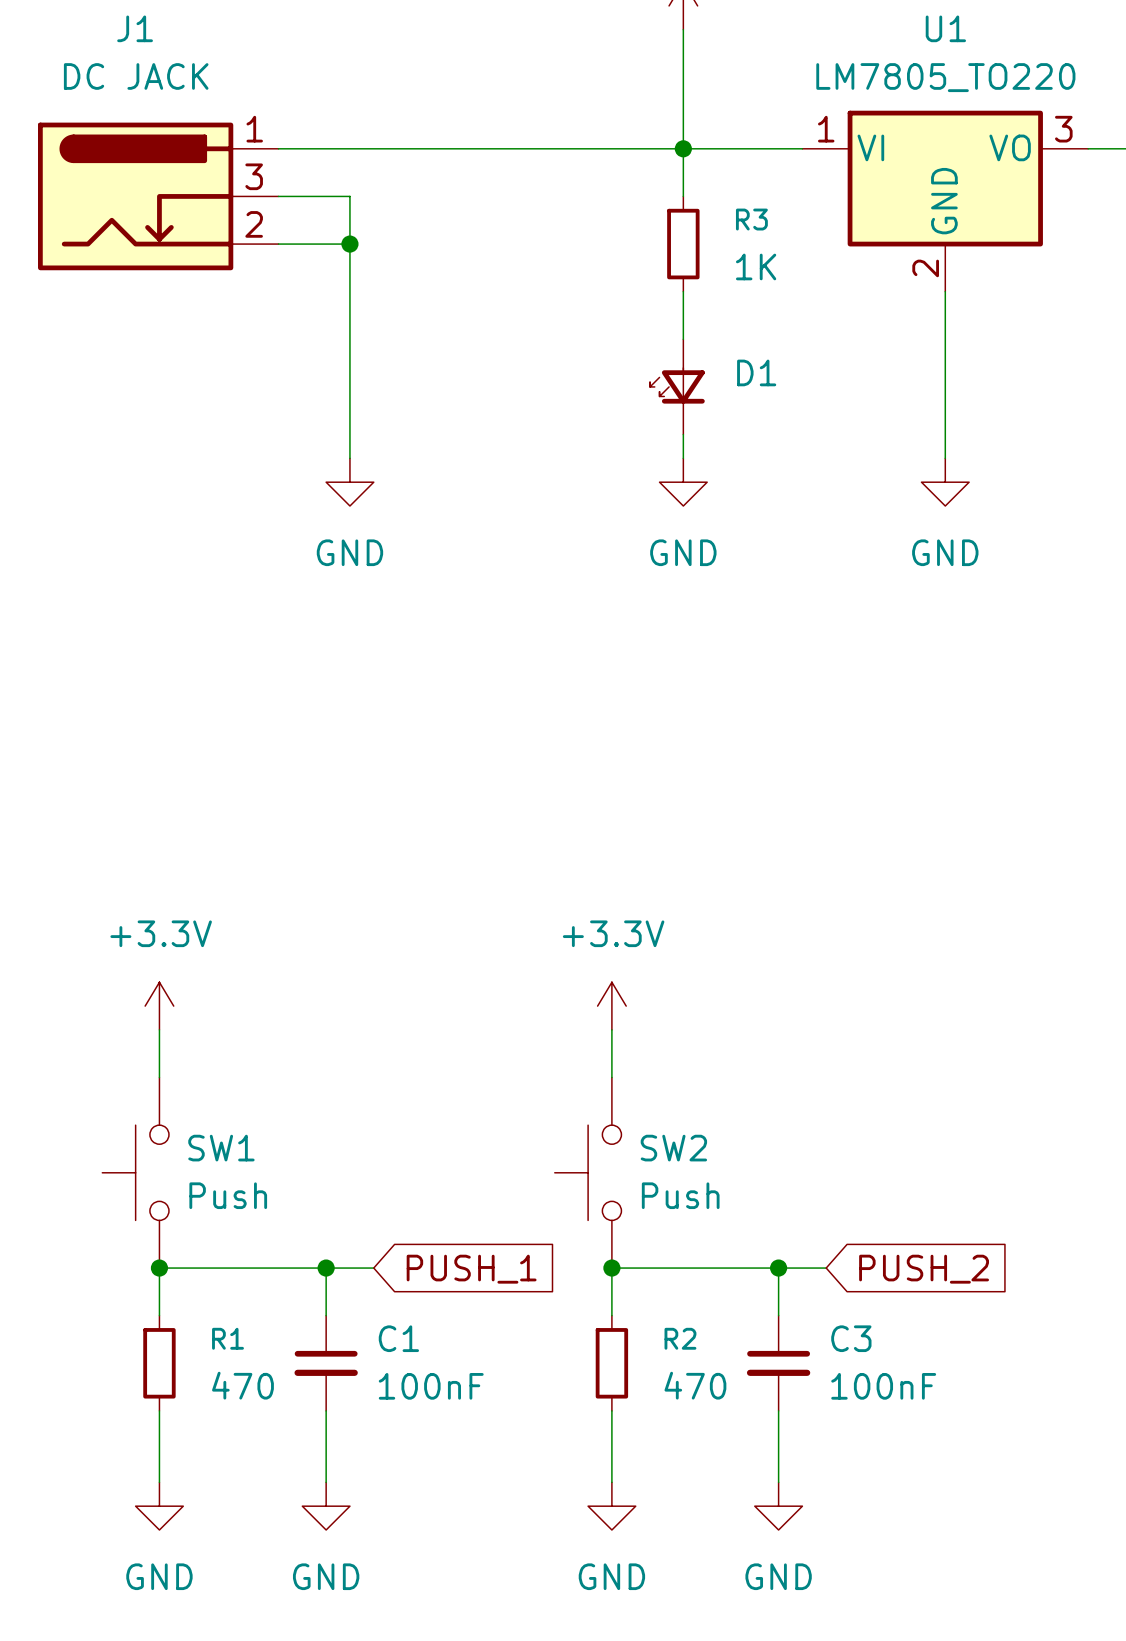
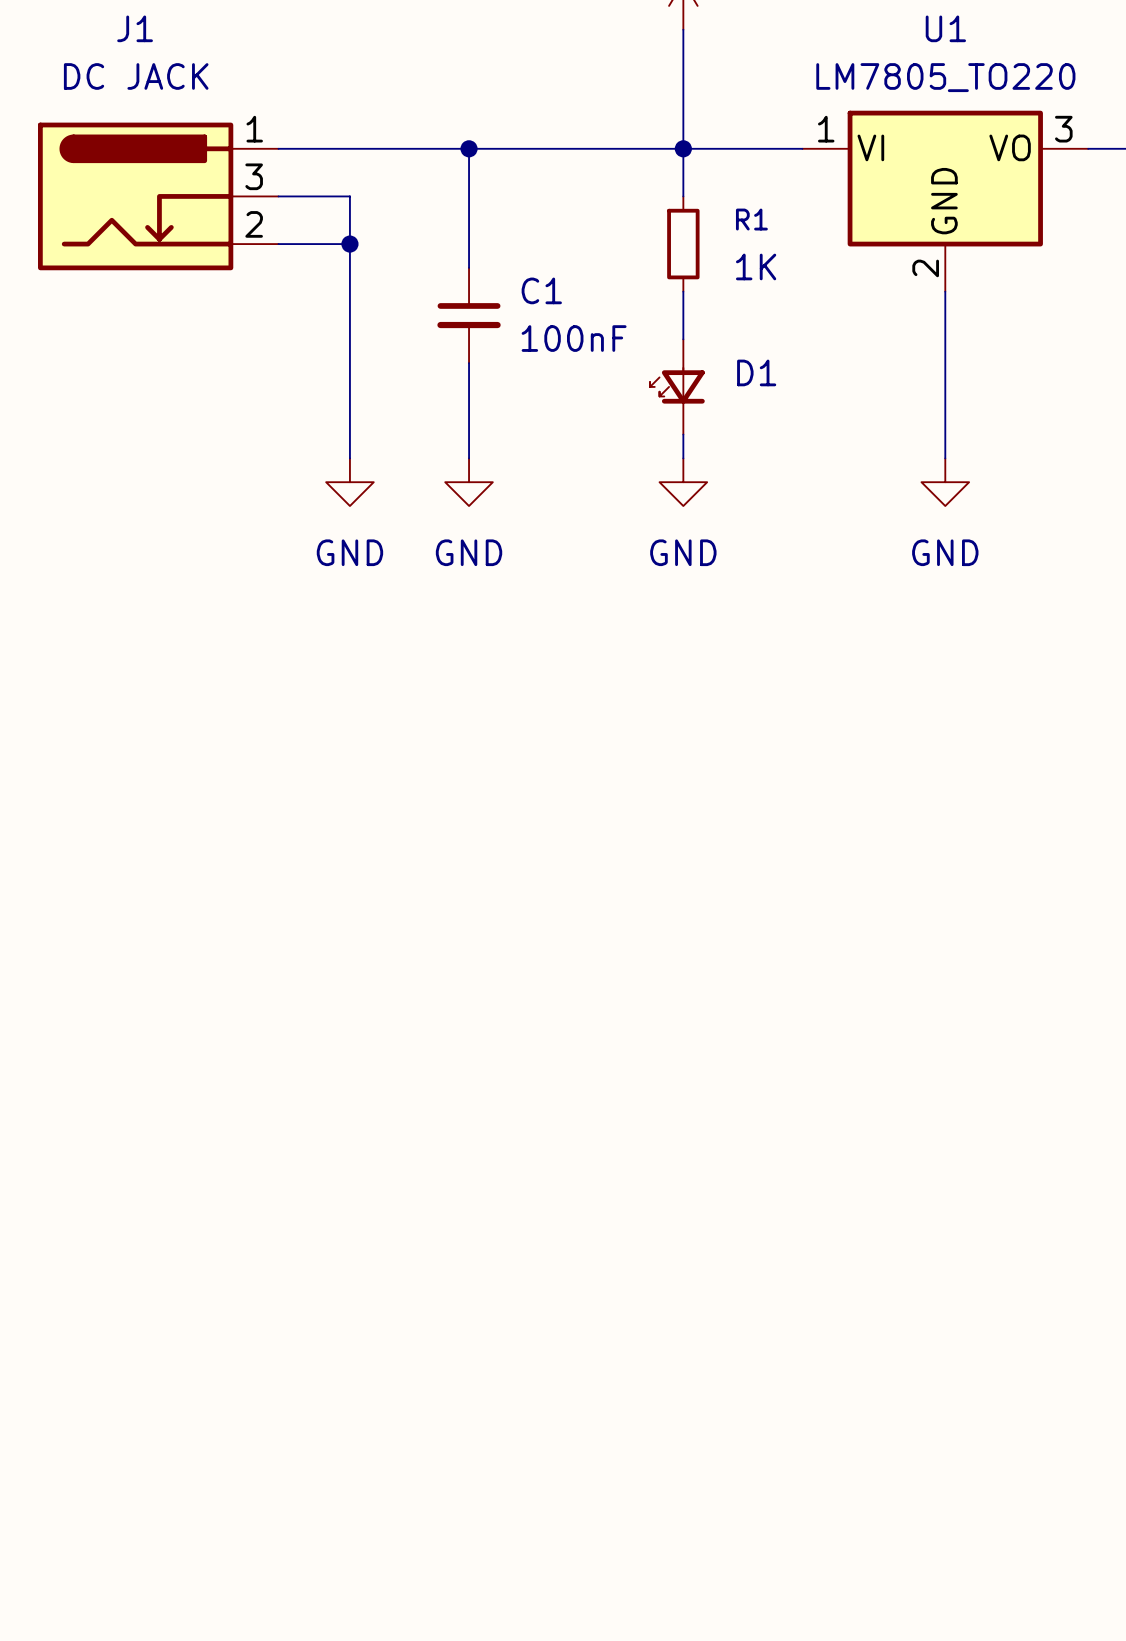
wire: none -> (469, 148) (469, 267)
junction: none -> (469, 148)
R3 name: R3 (751, 219) -> R1 (751, 219)
wire: none -> (469, 363) (469, 458)
power symbol: none -> GND (469, 482)
power symbol: +3.3V (159, 1006) -> none
power symbol: +3.3V (611, 1006) -> none
wire: (159, 1029) (159, 1077) -> none
wire: (611, 1029) (611, 1077) -> none
SW1: Push (135, 1172) -> none
SW2: Push (588, 1172) -> none
junction: (159, 1268) -> none
wire: (326, 1268) (326, 1315) -> none
junction: (326, 1268) -> none
wire: (373, 1268) (159, 1268) (159, 1315) -> none
junction: (611, 1268) -> none
wire: (778, 1268) (778, 1315) -> none
junction: (778, 1268) -> none
wire: (826, 1268) (611, 1268) (611, 1315) -> none
global label: PUSH_1 (471, 1269) -> none
global label: PUSH_2 (924, 1269) -> none
R1: 470 (159, 1363) -> none
C1 position: (326, 1363) -> (469, 315)
R2: 470 (611, 1363) -> none
C3: 100nF (778, 1363) -> none
wire: (159, 1410) (159, 1482) -> none
wire: (326, 1410) (326, 1482) -> none
wire: (611, 1410) (611, 1482) -> none
wire: (778, 1410) (778, 1482) -> none
power symbol: GND (159, 1506) -> none
power symbol: GND (326, 1506) -> none
power symbol: GND (611, 1506) -> none
power symbol: GND (778, 1506) -> none

